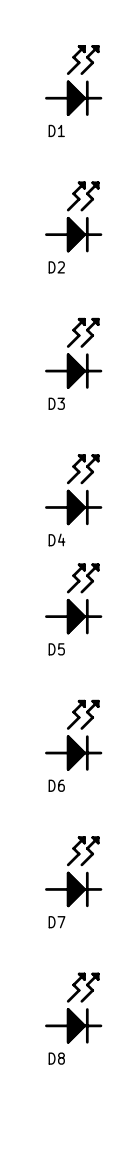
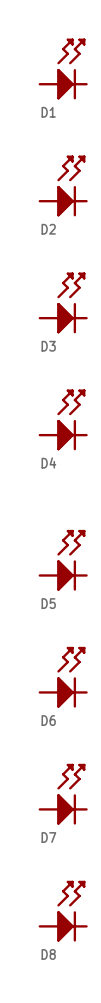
D5 position: (73, 598) -> (63, 560)
D6 position: (73, 735) -> (63, 677)
D7 position: (73, 871) -> (63, 794)
D8 position: (73, 1008) -> (63, 911)

